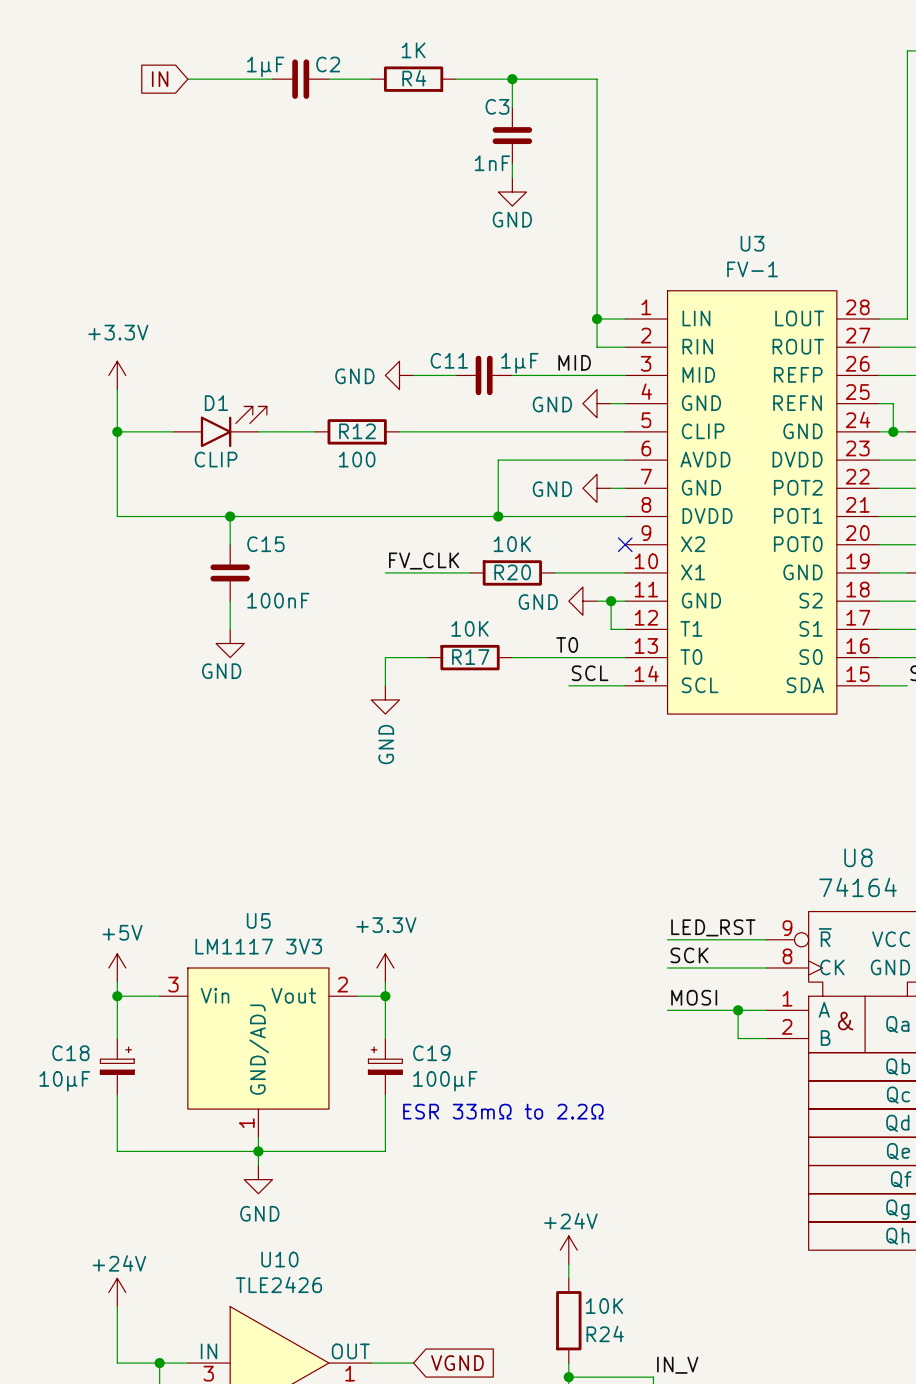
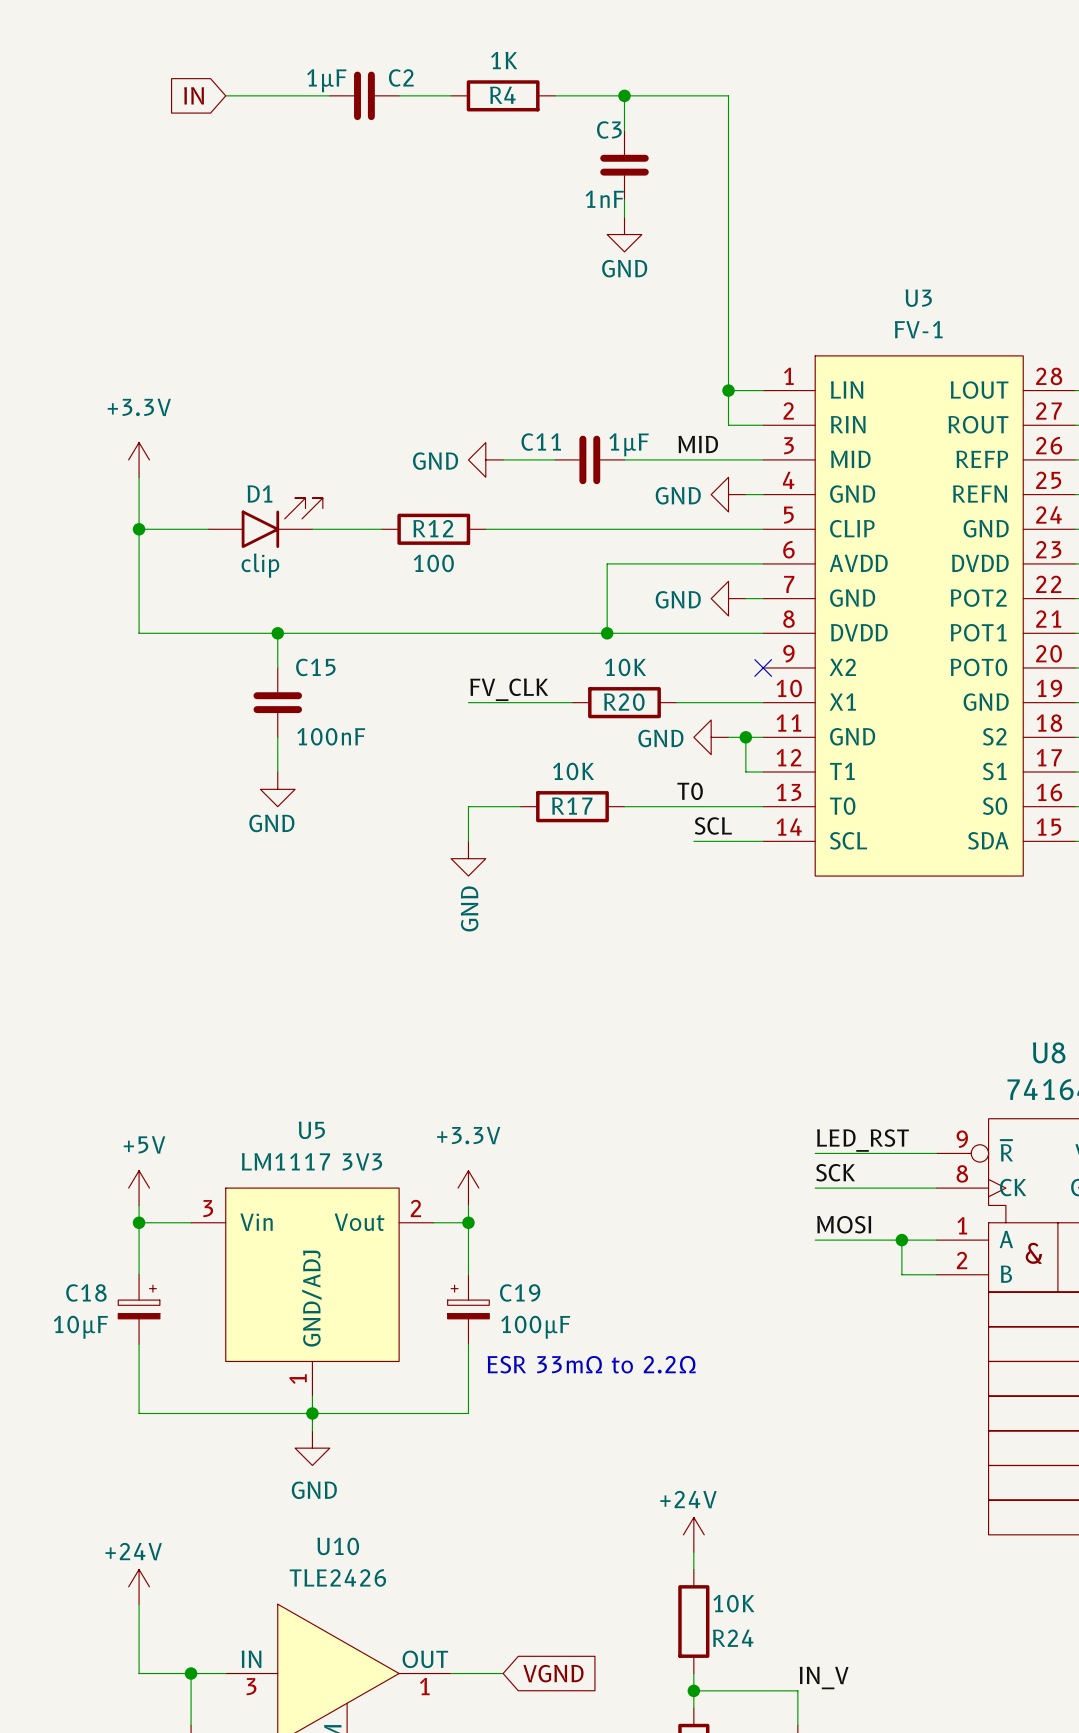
D1 value: CLIP (216, 459) -> clip (260, 565)

